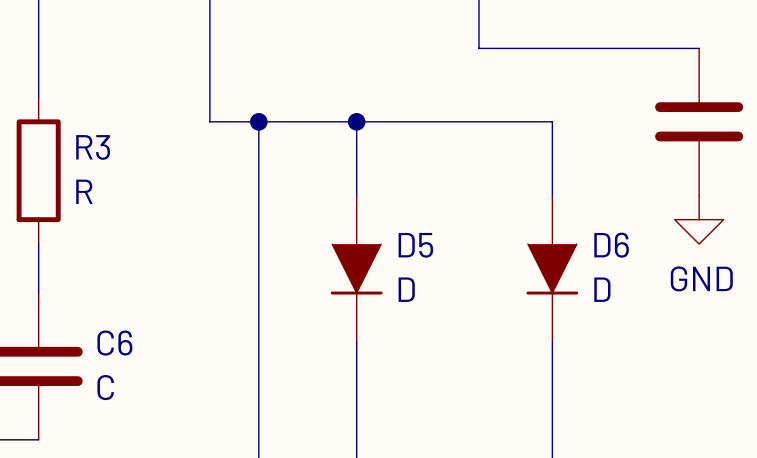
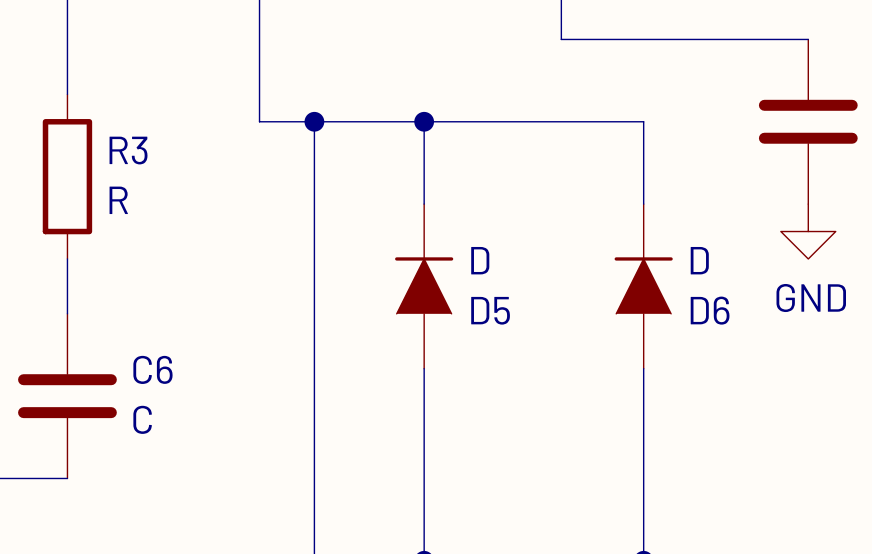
D5 name position: D5 (415, 245) -> D5 (490, 310)
D6 name position: D6 (611, 245) -> D6 (710, 310)
D5 rotation: 0° (356, 269) -> 180° (424, 285)
D6 rotation: 0° (552, 269) -> 180° (643, 285)
D5 value position: D (406, 289) -> D (480, 260)
D6 value position: D (602, 289) -> D (699, 260)

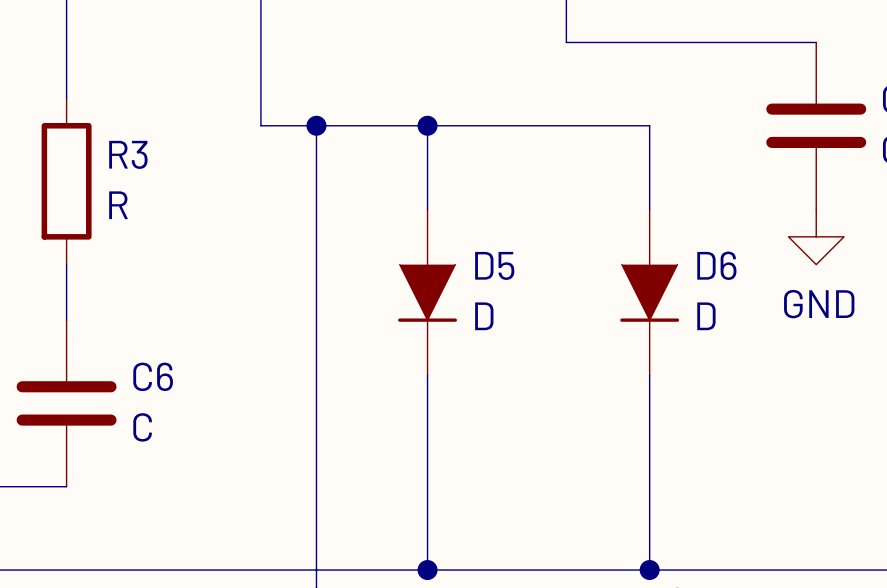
D5 value position: D (480, 260) -> D (484, 316)
D6 value position: D (699, 260) -> D (706, 316)
D5 rotation: 0° (424, 285) -> 180° (427, 293)
D6 rotation: 0° (643, 285) -> 180° (649, 293)
D5 name position: D5 (490, 310) -> D5 (494, 265)
D6 name position: D6 (710, 310) -> D6 (716, 265)

